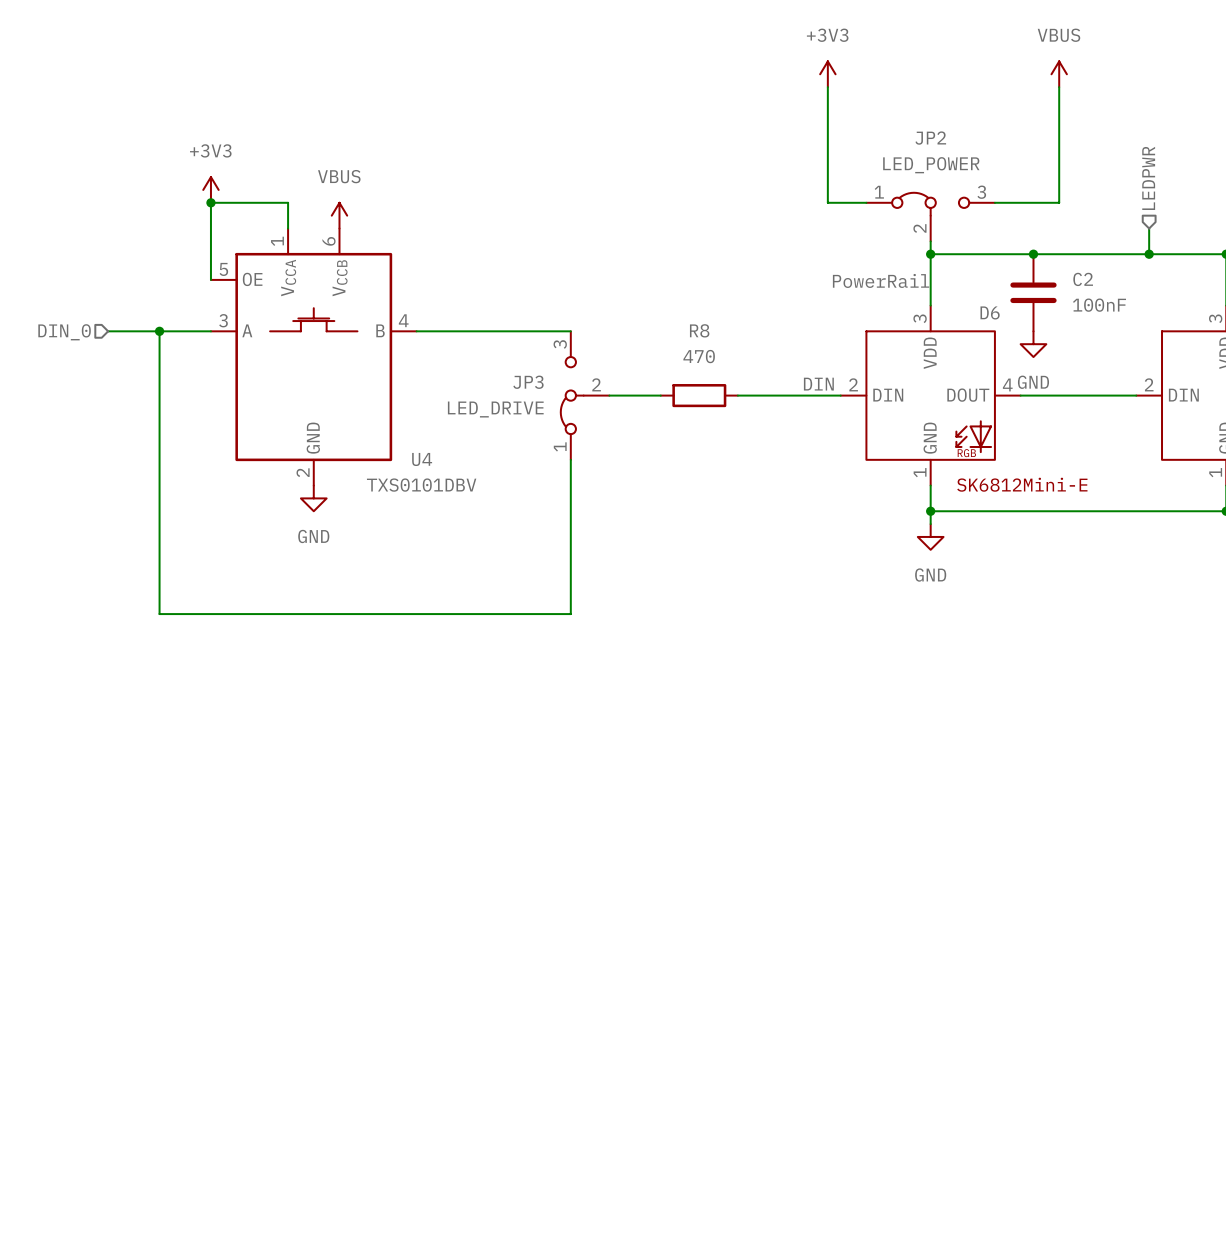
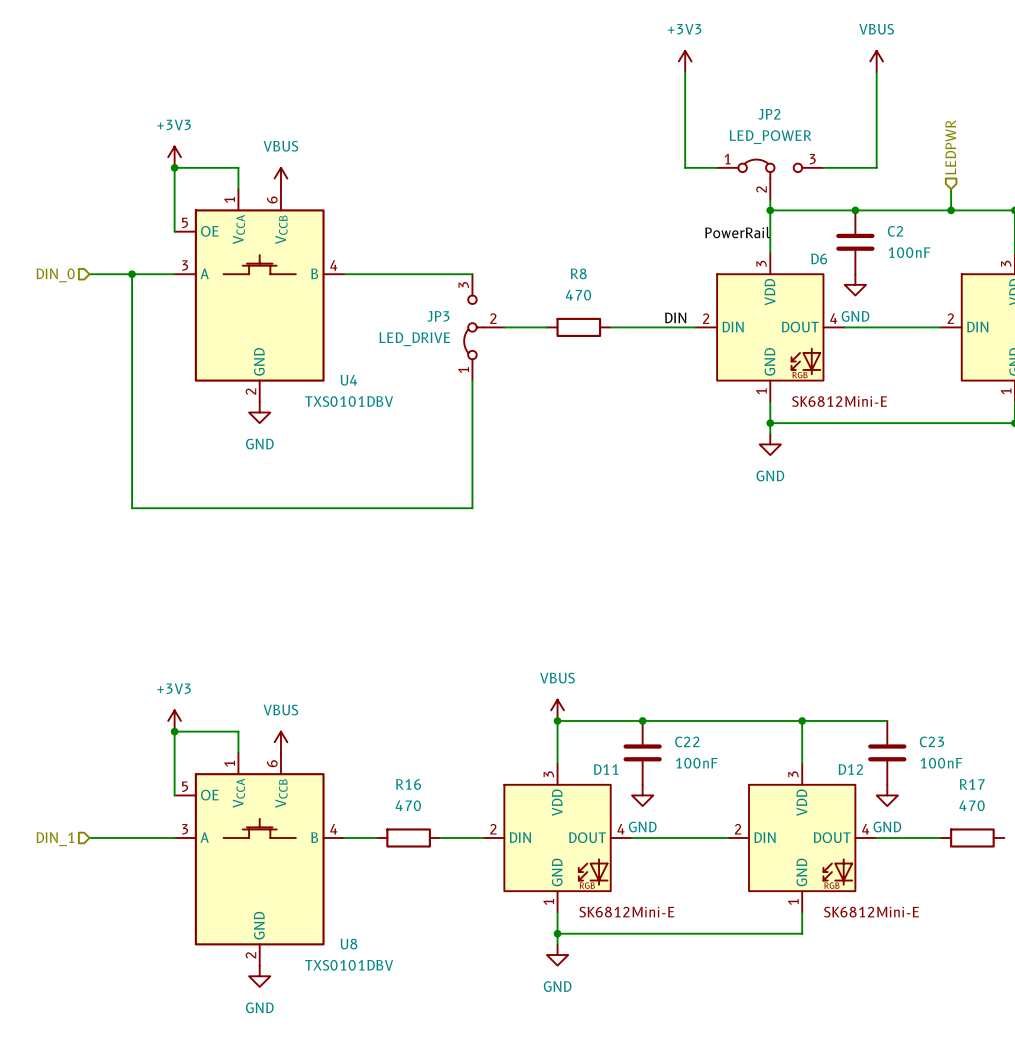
power symbol: none -> VBUS (557, 710)
power symbol: none -> +3V3 (174, 720)
junction: none -> (557, 720)
junction: none -> (642, 720)
wire: none -> (802, 720) (802, 763)
junction: none -> (802, 720)
wire: none -> (887, 720) (557, 720) (557, 763)
junction: none -> (174, 731)
power symbol: none -> VBUS (280, 742)
wire: none -> (238, 752) (238, 731) (174, 731) (174, 795)
C22: none -> 100nF (642, 752)
C23: none -> 100nF (887, 752)
power symbol: none -> GND (642, 795)
power symbol: none -> GND (887, 795)
wire: none -> (89, 837) (174, 837)
wire: none -> (344, 837) (376, 837)
R16: none -> 470 (408, 837)
wire: none -> (440, 837) (483, 837)
D11: none -> (557, 837)
wire: none -> (632, 837) (727, 837)
D12: none -> (802, 837)
wire: none -> (876, 837) (940, 837)
R17: none -> 470 (972, 837)
hierarchical label: none -> DIN_1 (55, 839)
U8: none -> TXS0101DBV (259, 859)
wire: none -> (557, 912) (557, 944)
wire: none -> (802, 912) (802, 933) (557, 933)
junction: none -> (557, 933)
power symbol: none -> GND (557, 955)
power symbol: none -> GND (259, 976)

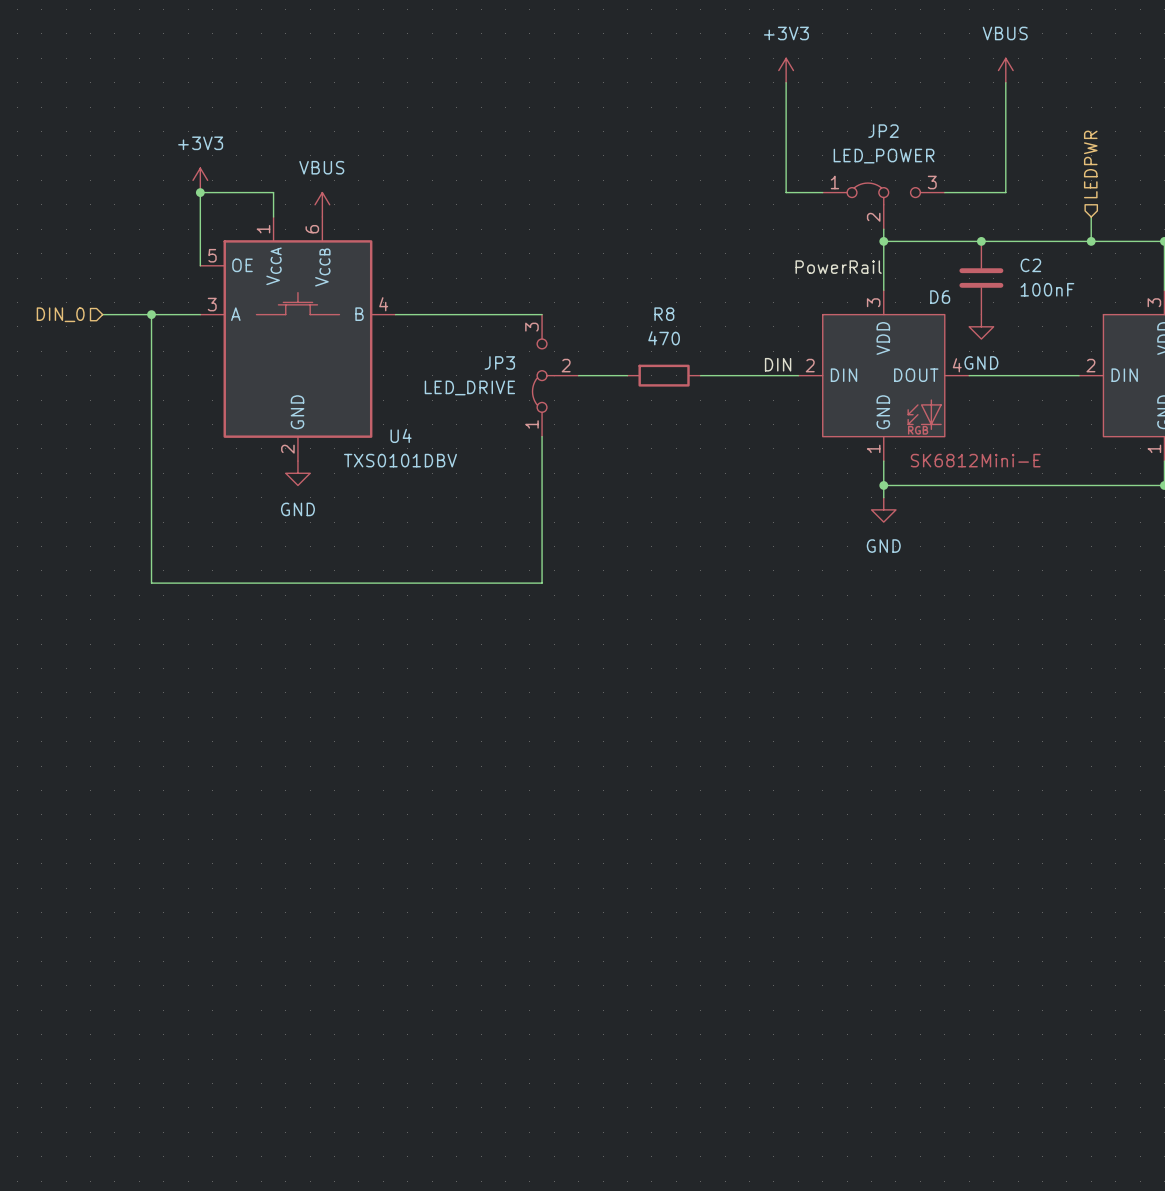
power symbol: VBUS (557, 710) -> none
power symbol: +3V3 (174, 720) -> none
junction: (557, 720) -> none
junction: (642, 720) -> none
wire: (802, 720) (802, 763) -> none
junction: (802, 720) -> none
wire: (887, 720) (557, 720) (557, 763) -> none
junction: (174, 731) -> none
power symbol: VBUS (280, 742) -> none
wire: (238, 752) (238, 731) (174, 731) (174, 795) -> none
C22: 100nF (642, 752) -> none
C23: 100nF (887, 752) -> none
power symbol: GND (642, 795) -> none
power symbol: GND (887, 795) -> none
wire: (89, 837) (174, 837) -> none
wire: (344, 837) (376, 837) -> none
R16: 470 (408, 837) -> none
wire: (440, 837) (483, 837) -> none
D11: (557, 837) -> none
wire: (632, 837) (727, 837) -> none
D12: (802, 837) -> none
wire: (876, 837) (940, 837) -> none
R17: 470 (972, 837) -> none
hierarchical label: DIN_1 (55, 839) -> none
U8: TXS0101DBV (259, 859) -> none
wire: (557, 912) (557, 944) -> none
wire: (802, 912) (802, 933) (557, 933) -> none
junction: (557, 933) -> none
power symbol: GND (557, 955) -> none
power symbol: GND (259, 976) -> none

